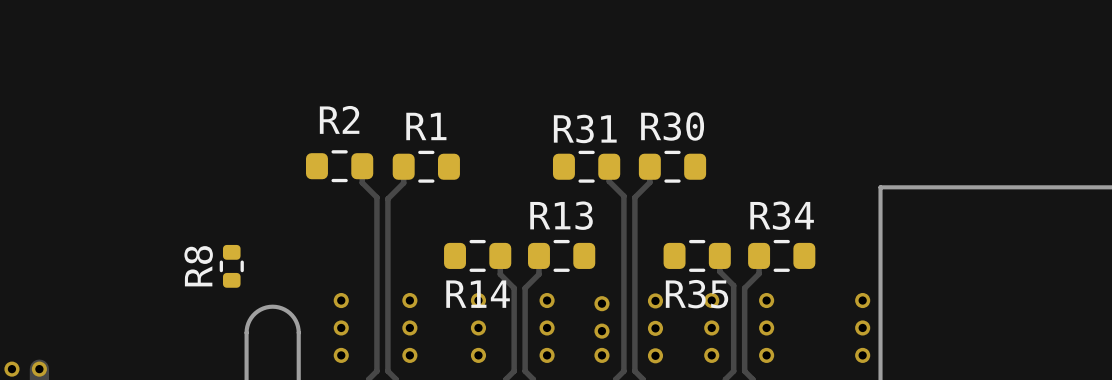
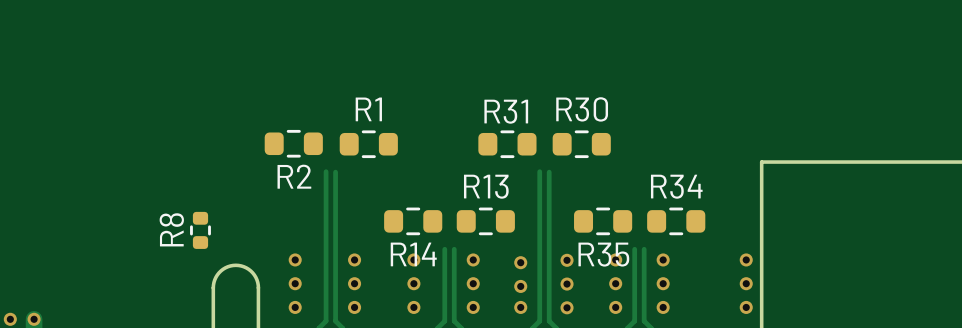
R2 name position: R2 (339, 119) -> R2 (294, 176)
track: (362, 166) (362, 182) (376, 198) -> none
track: (403, 166) (403, 183) (387, 198) -> none
track: (609, 166) (609, 181) (623, 196) (623, 198) -> none
track: (649, 166) (649, 182) (634, 198) -> none
track: (500, 255) (500, 274) (514, 288) -> none
track: (538, 255) (538, 274) (525, 288) -> none
track: (719, 255) (719, 271) (733, 285) (733, 288) -> none
track: (759, 255) (759, 273) (744, 288) -> none

